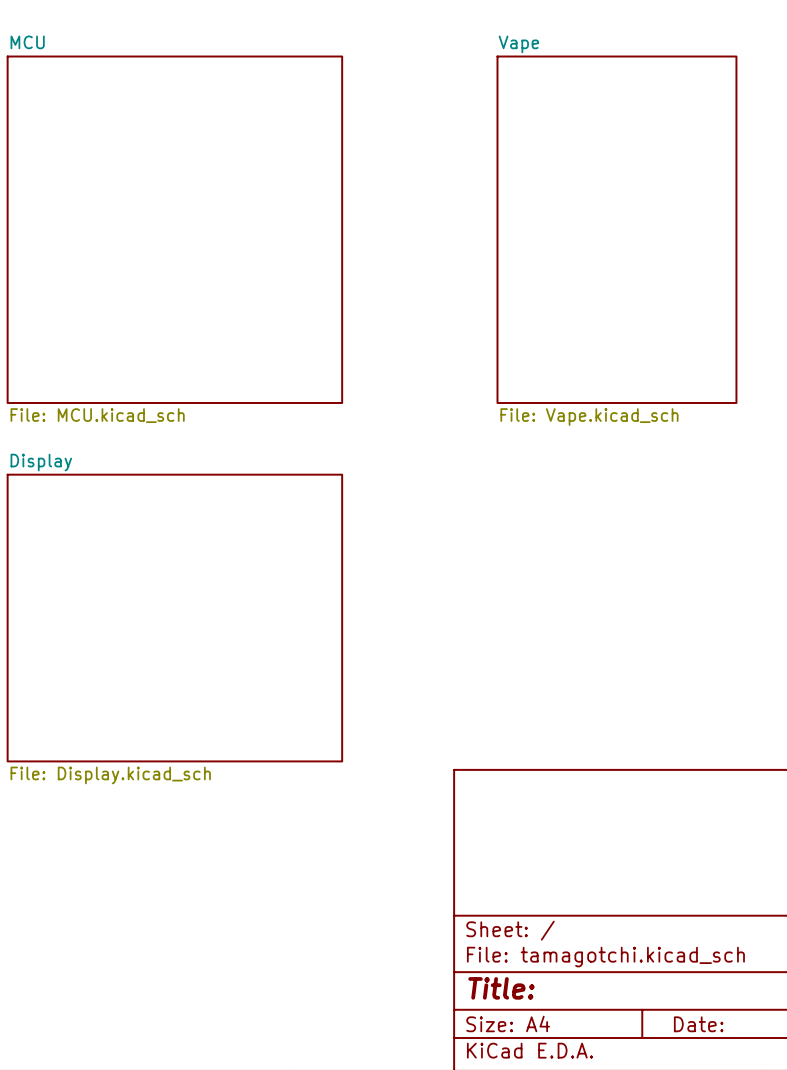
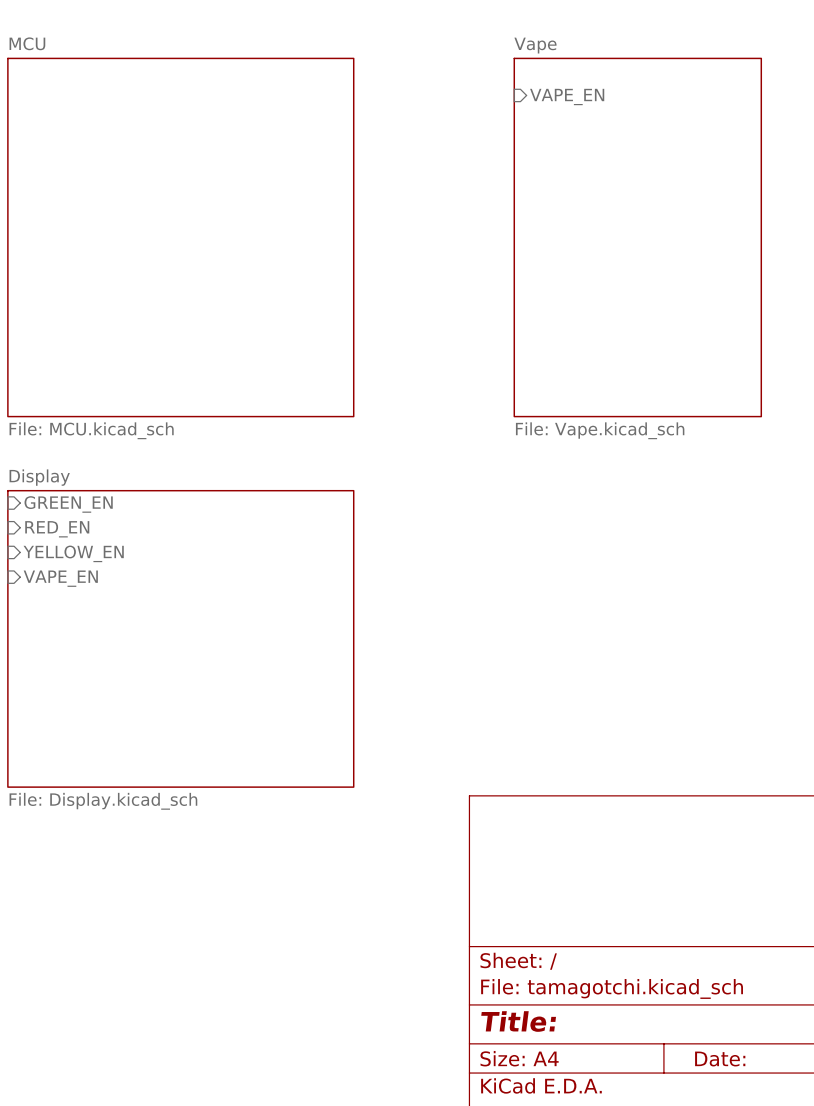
sheet pin: none -> VAPE_EN (567, 97)
sheet pin: none -> GREEN_EN (68, 504)
sheet pin: none -> RED_EN (57, 529)
sheet pin: none -> YELLOW_EN (73, 553)
sheet pin: none -> VAPE_EN (60, 578)

